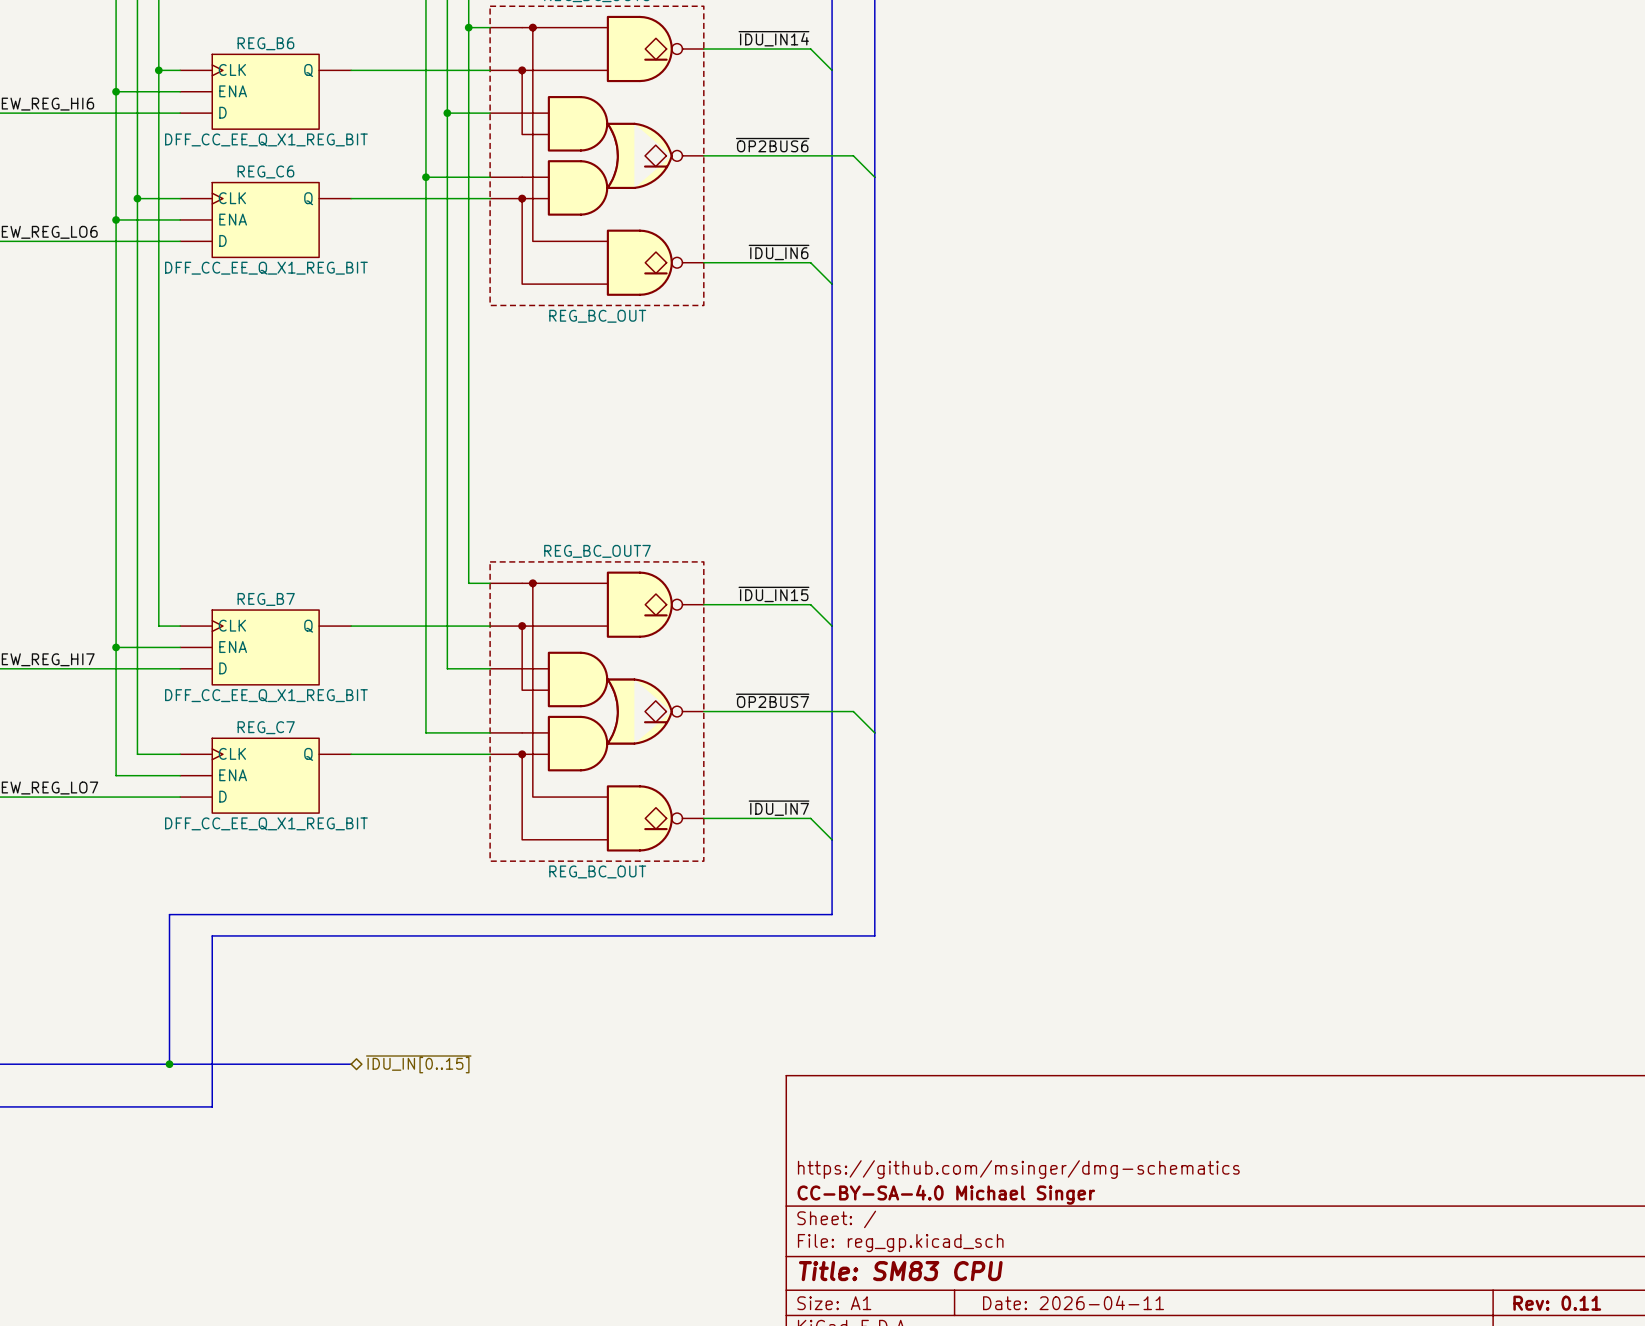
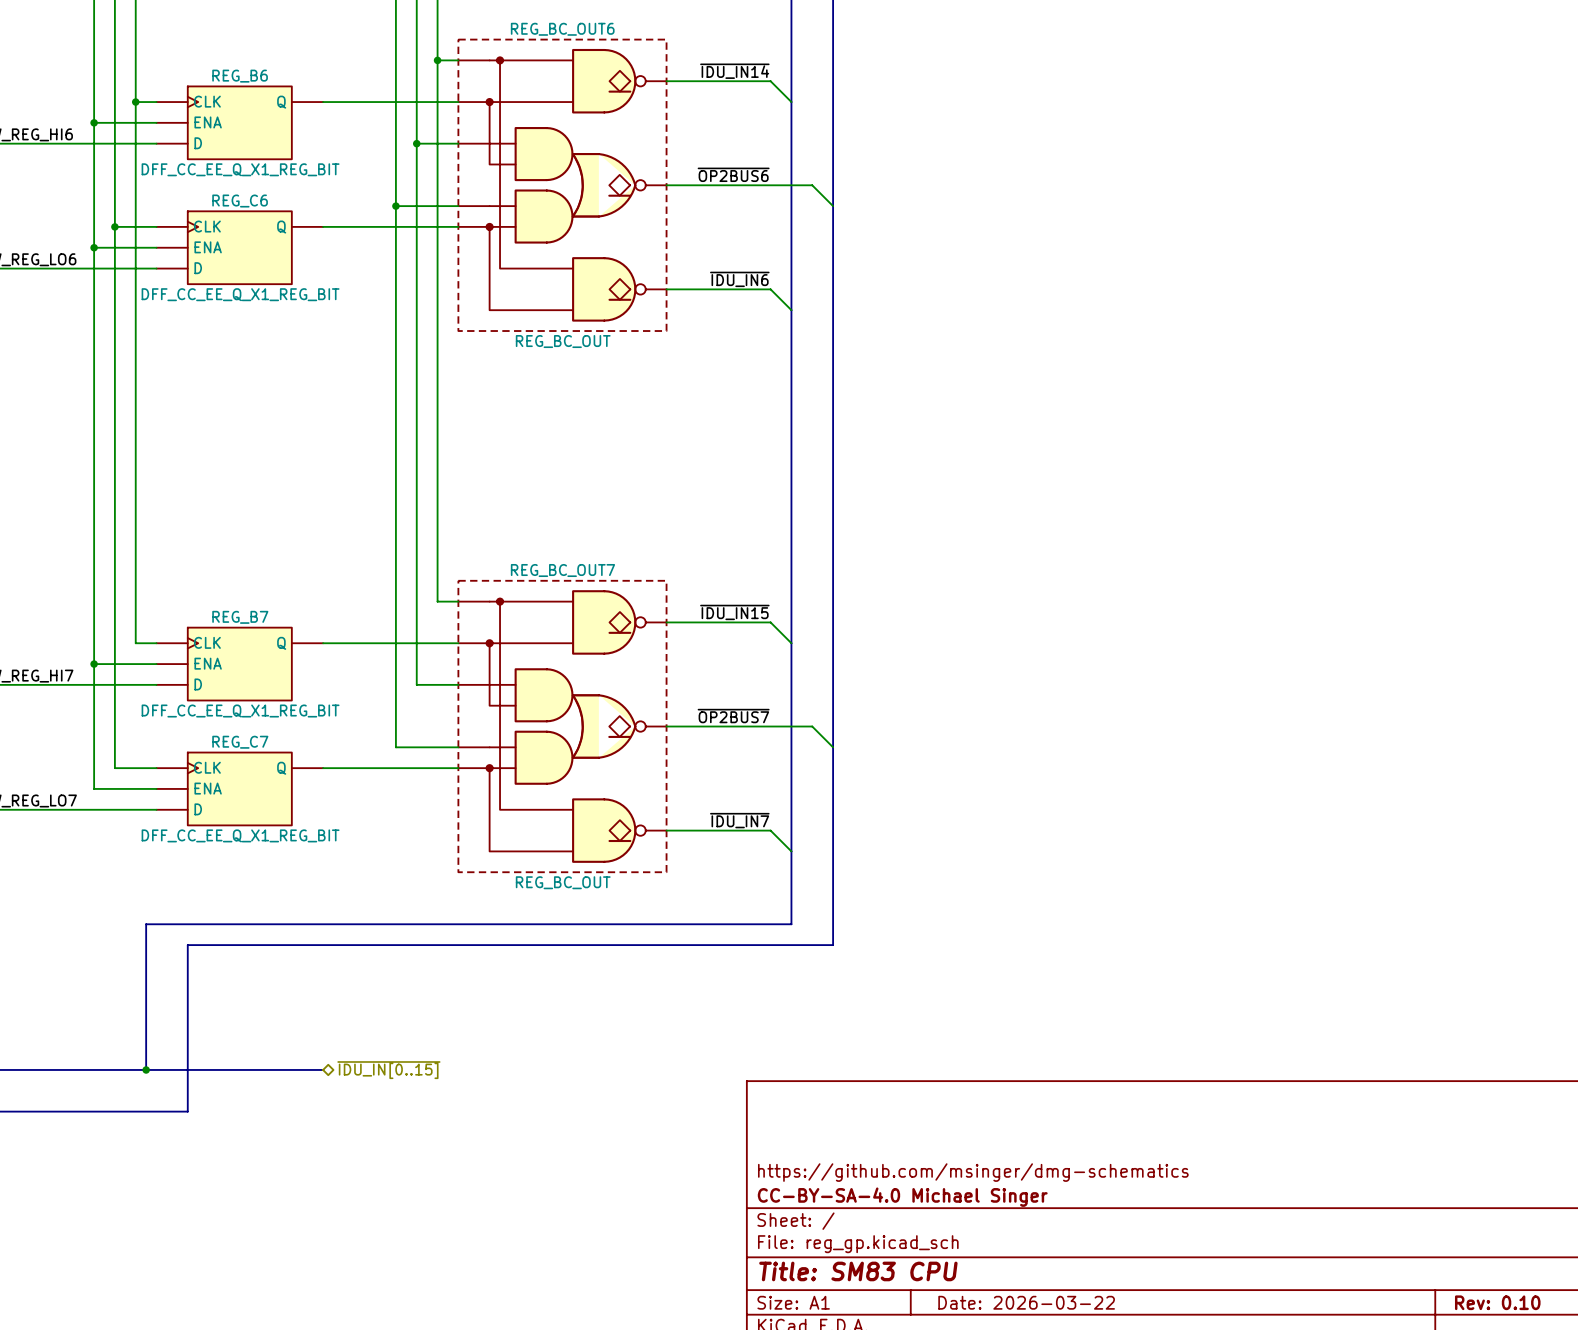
title block: Date: 2026-04-11 (1073, 1302) -> Date: 2026-03-22 (1026, 1302)
title block: Rev: 0.11 (1557, 1303) -> Rev: 0.10 (1497, 1302)

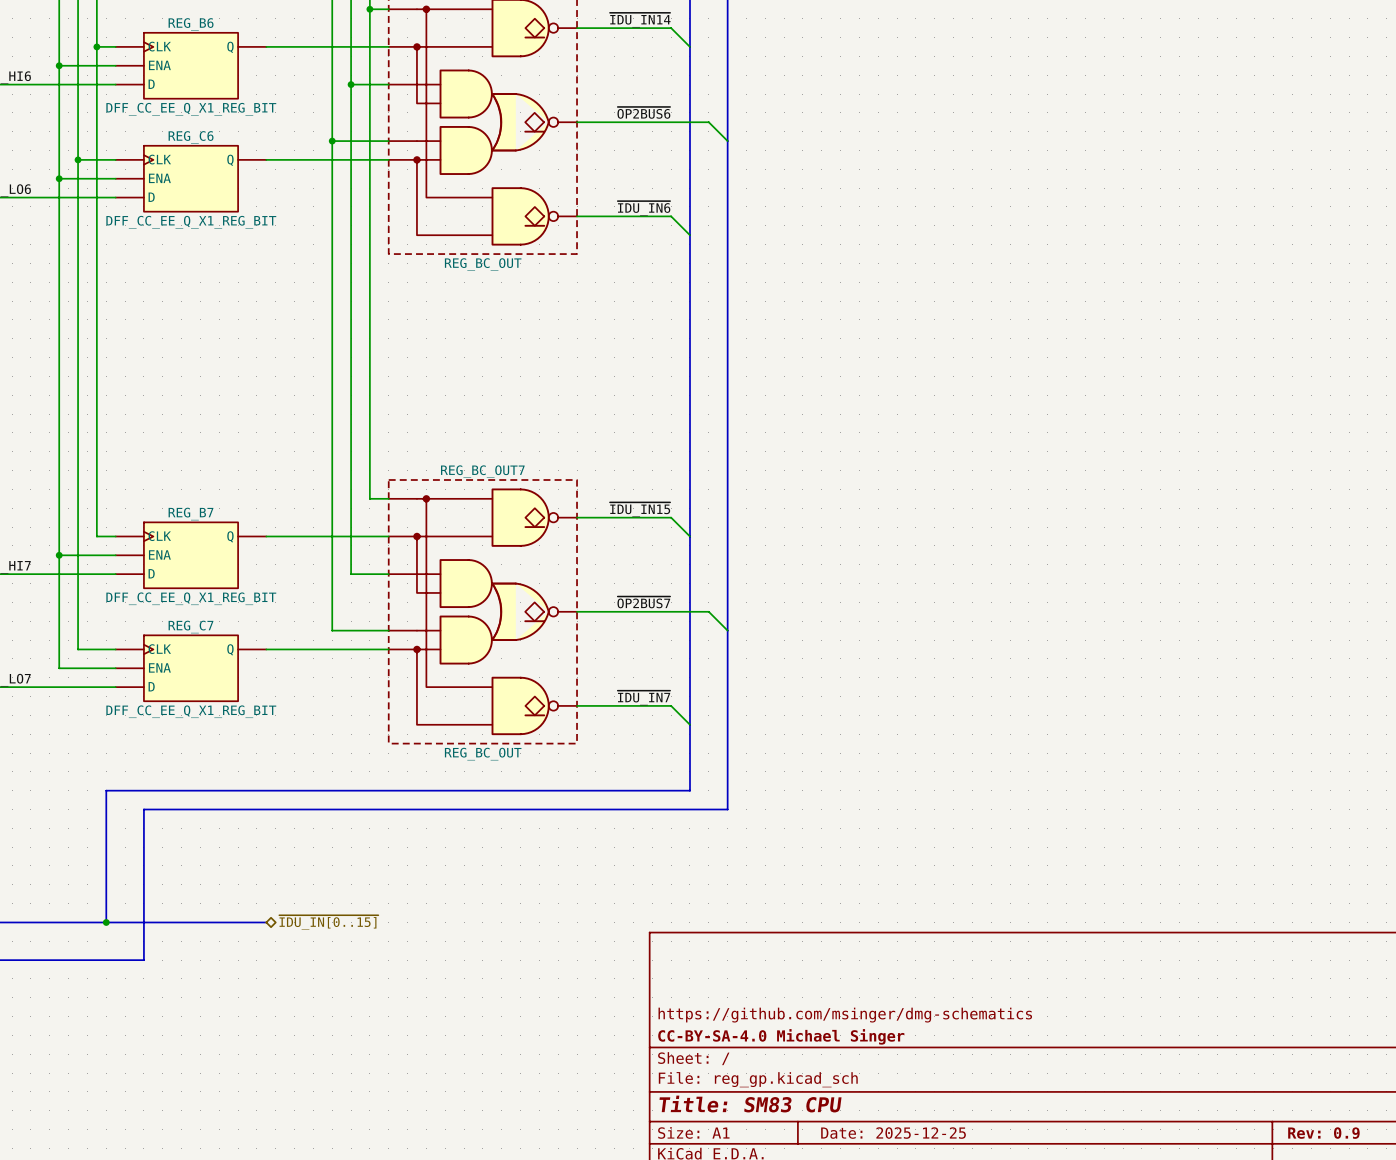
title block: Date: 2026-03-22 (1026, 1302) -> Date: 2025-12-25 (893, 1133)
title block: Rev: 0.10 (1497, 1302) -> Rev: 0.9 (1323, 1133)

